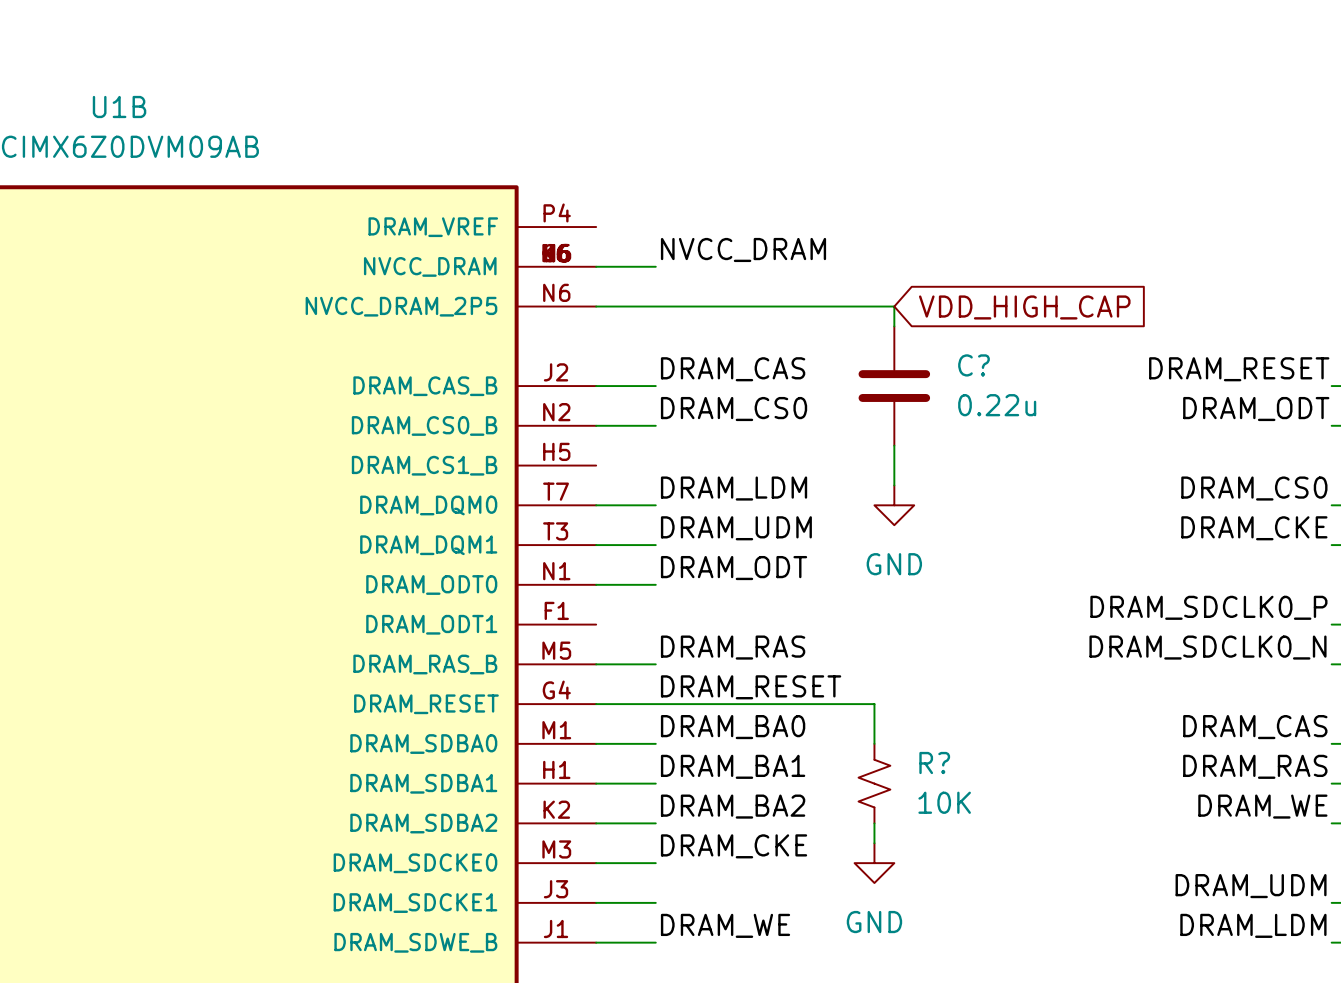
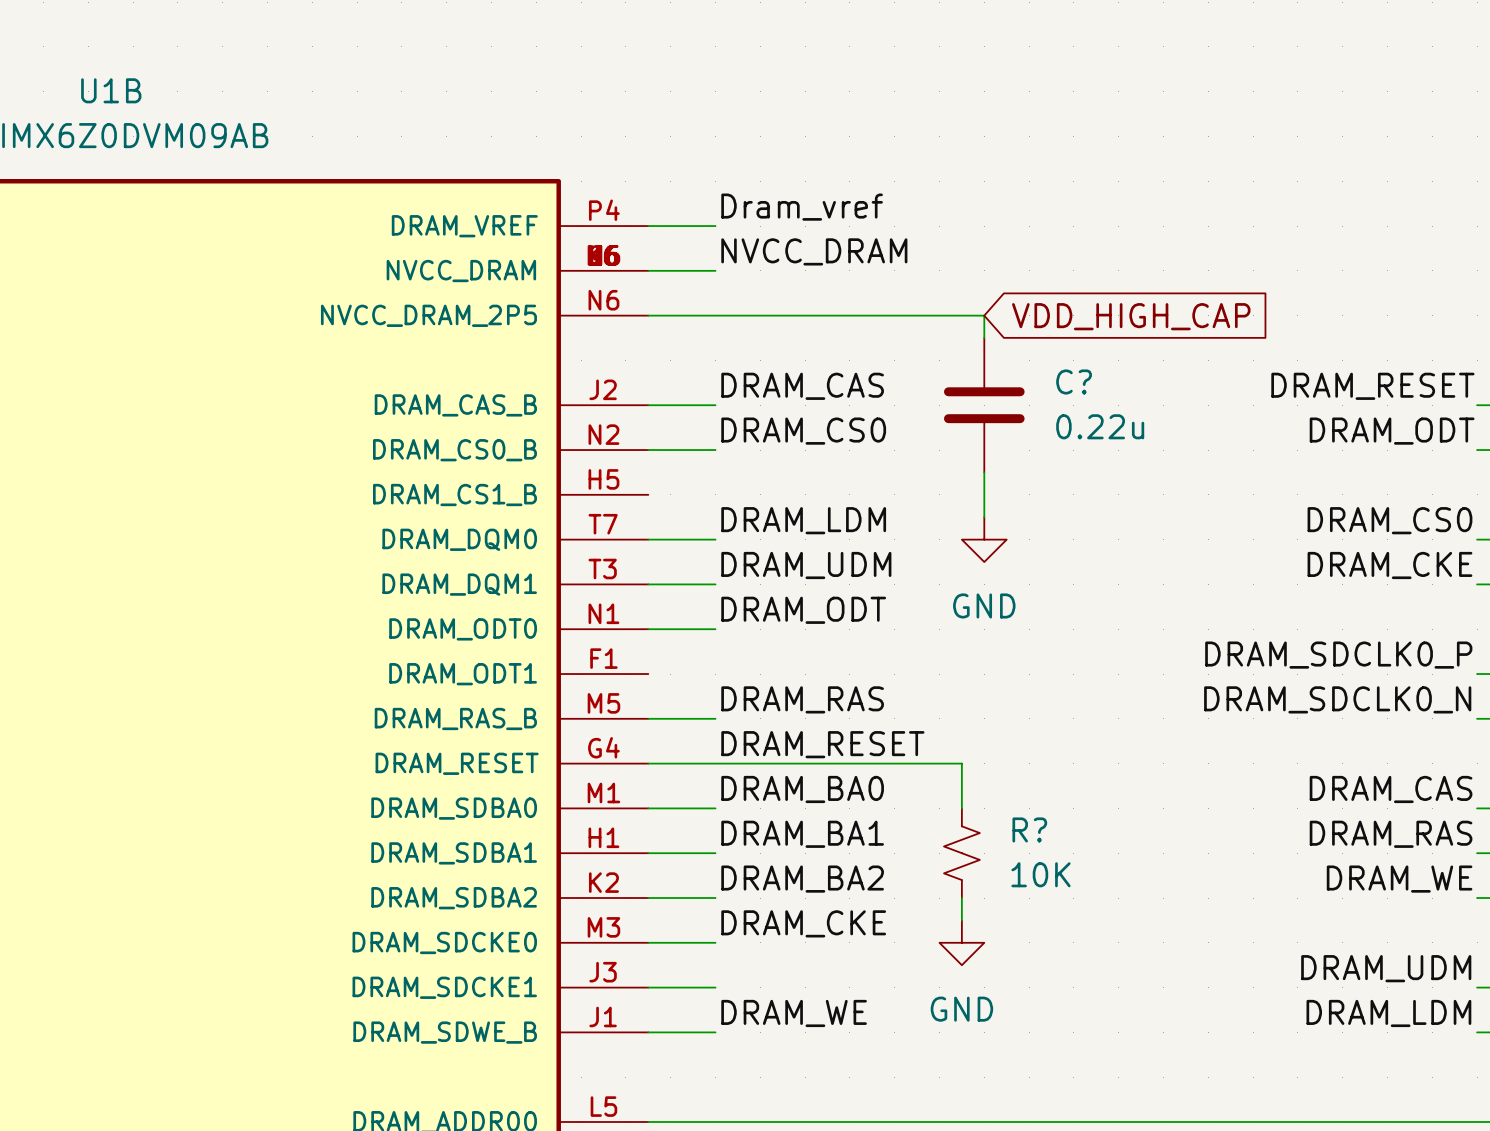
label: none -> Dram_vref (802, 207)
wire: none -> (648, 226) (715, 226)

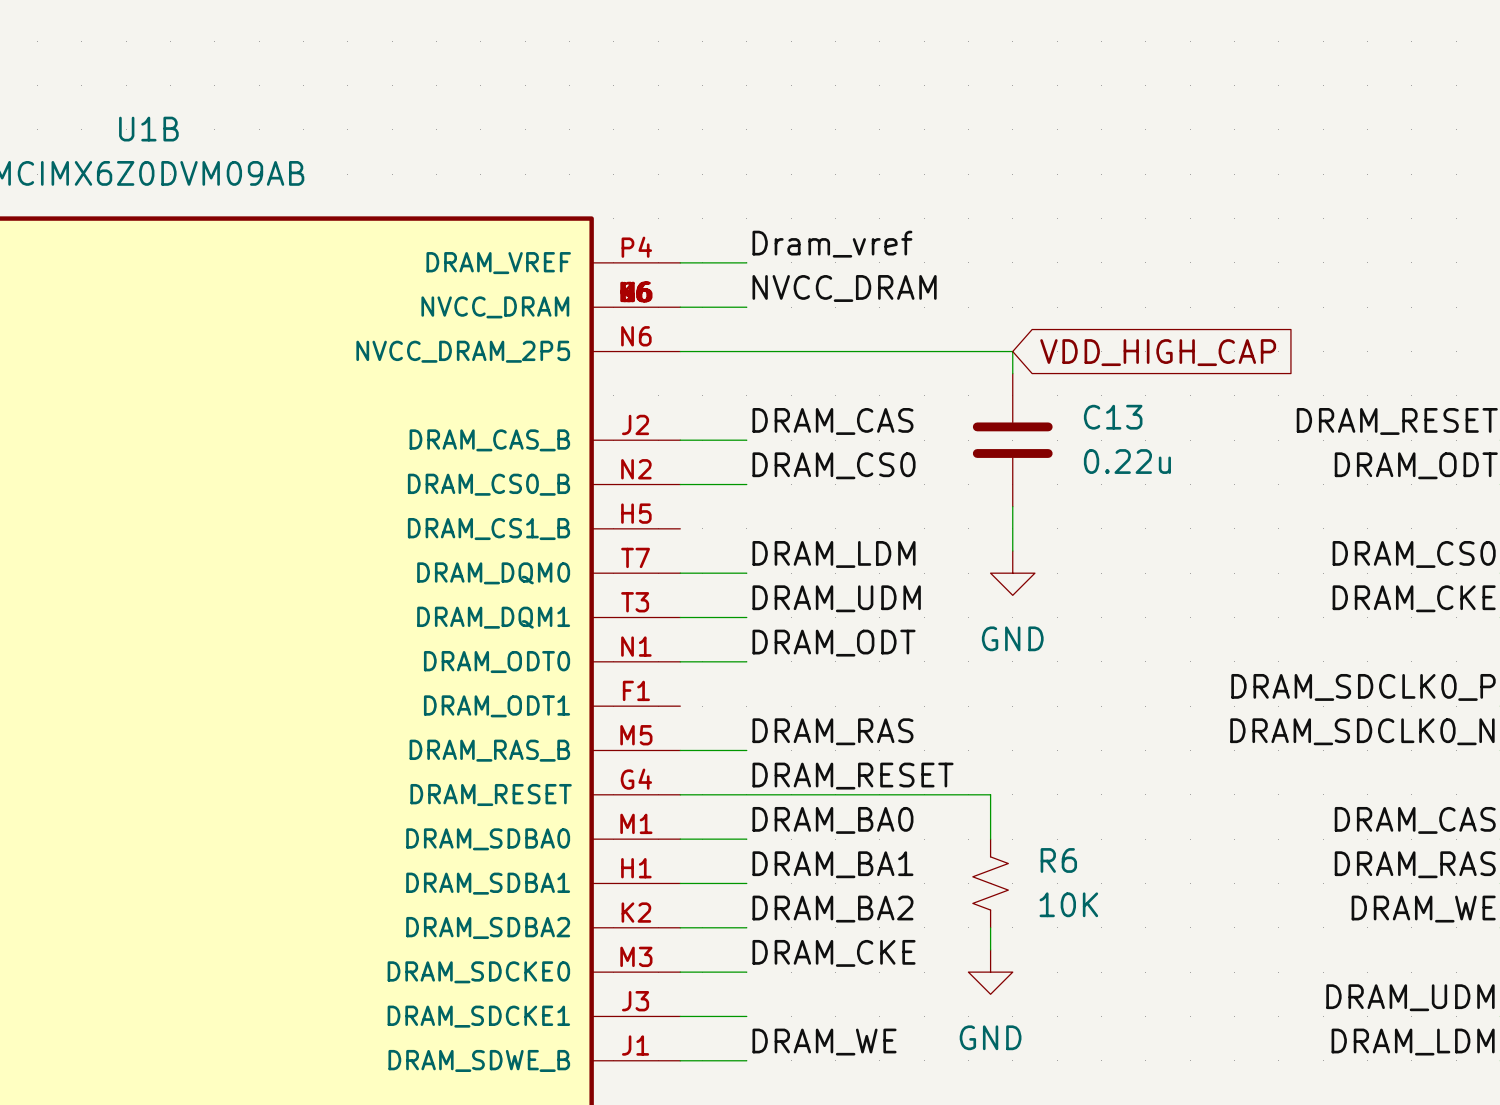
C? name: C? (1074, 381) -> C13 (1113, 417)
R? name: R? (1029, 829) -> R6 (1058, 860)

